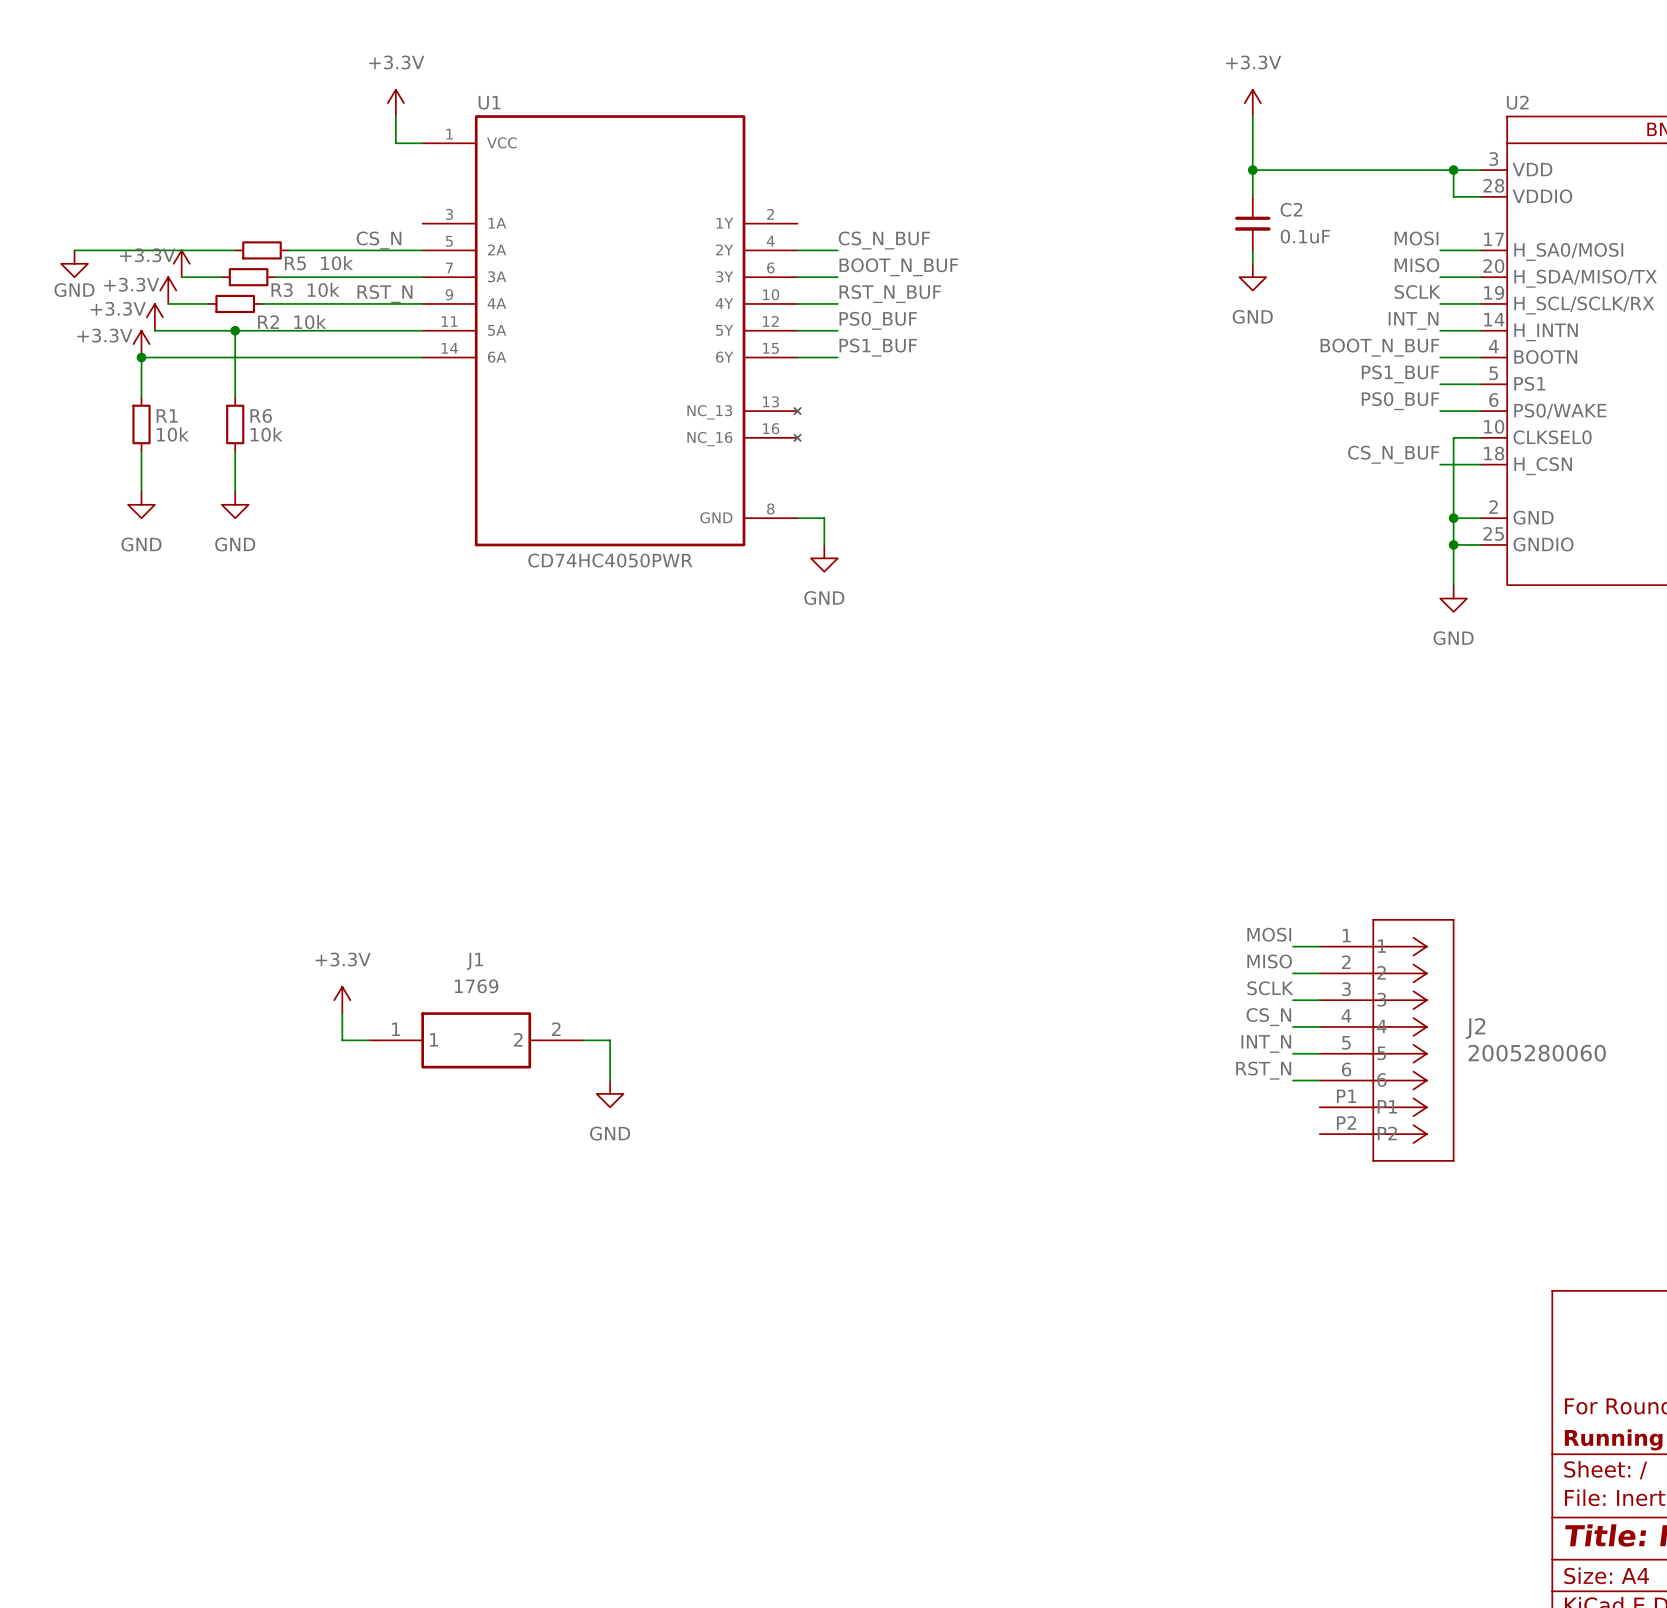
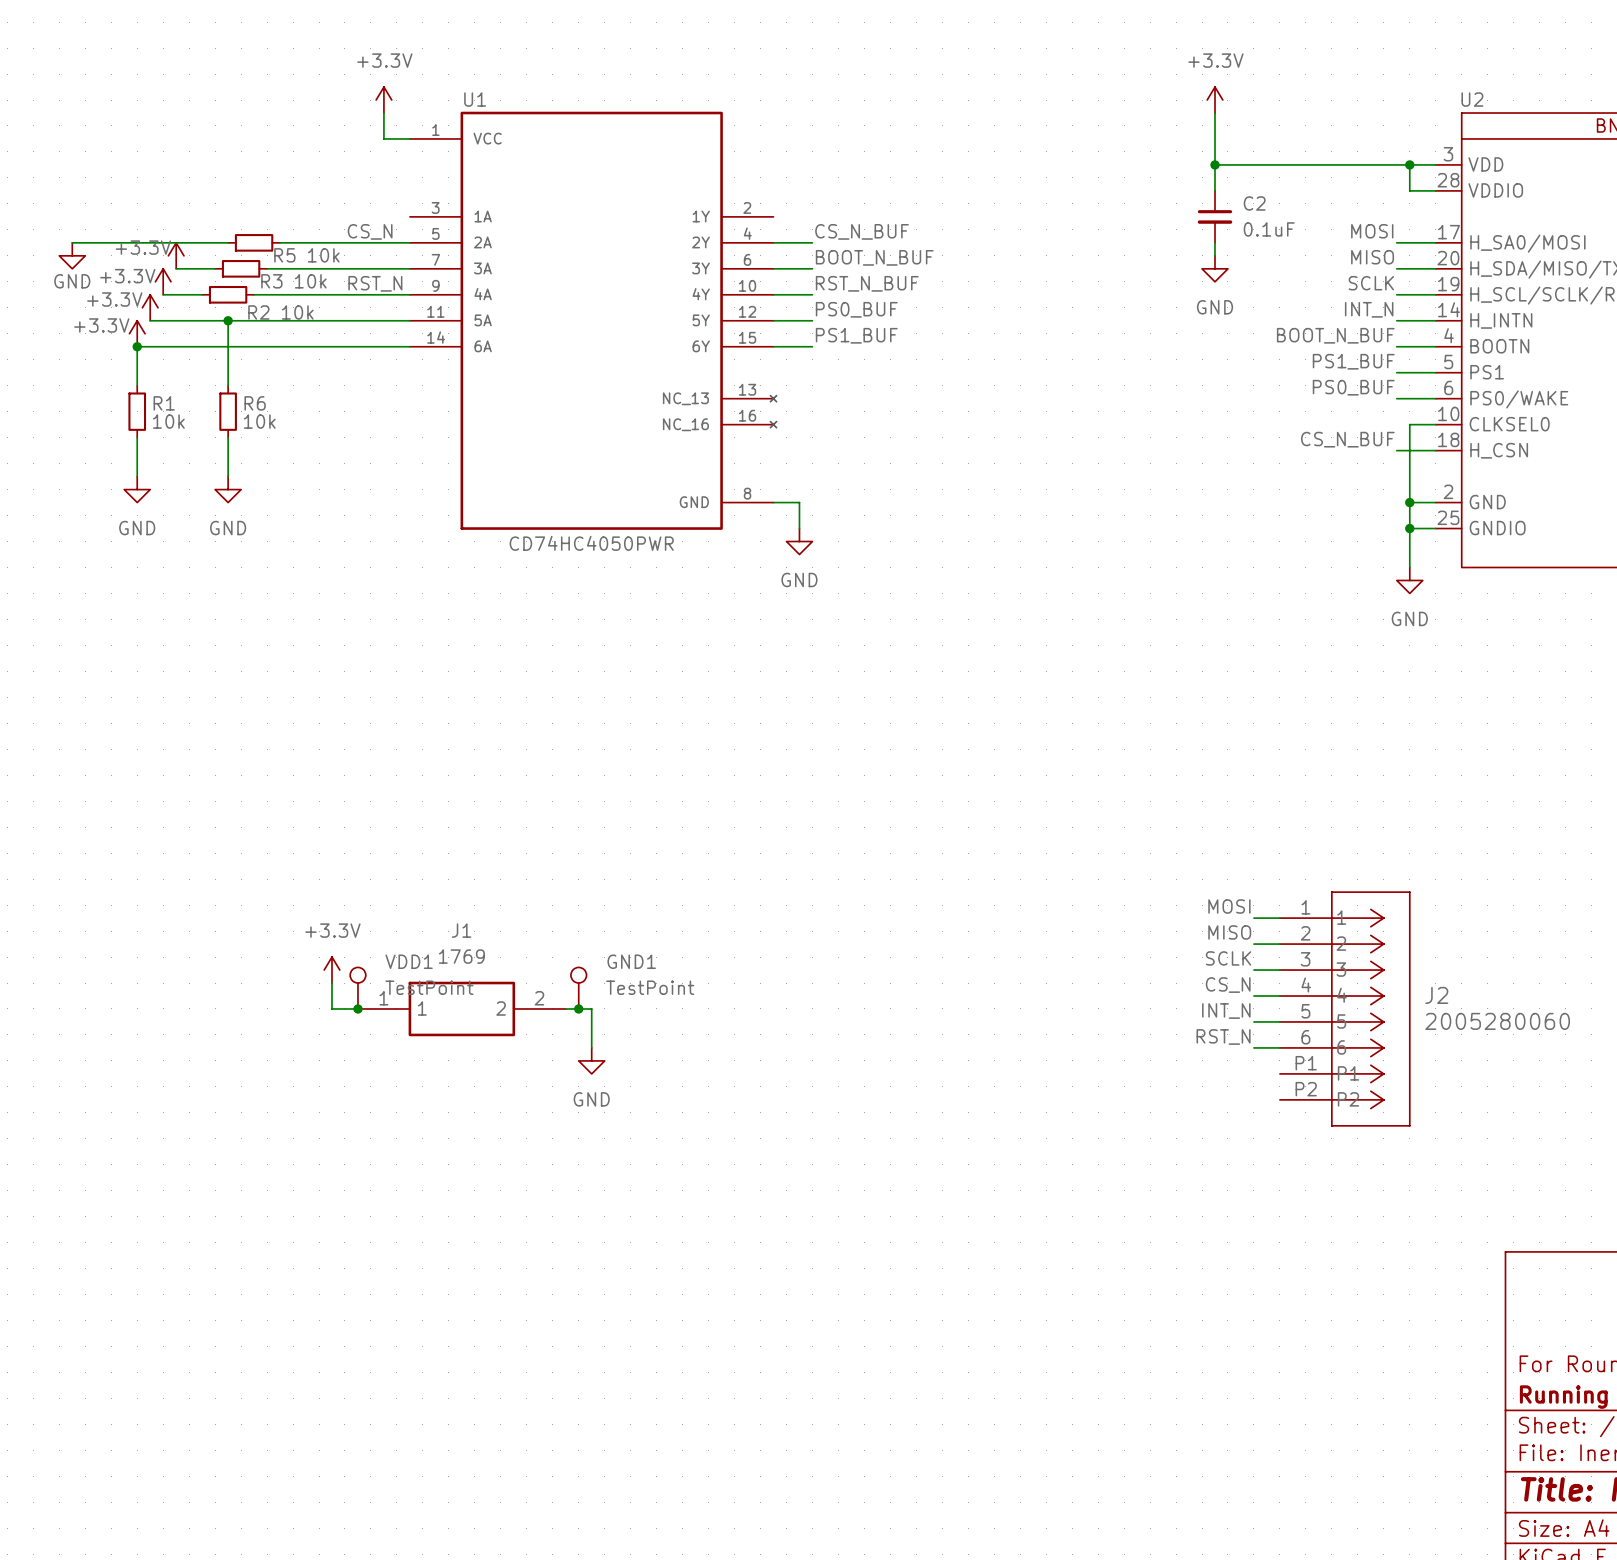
VDD1: none -> TestPoint (357, 988)
GND1: none -> TestPoint (578, 988)
junction: none -> (357, 1008)
junction: none -> (578, 1008)

